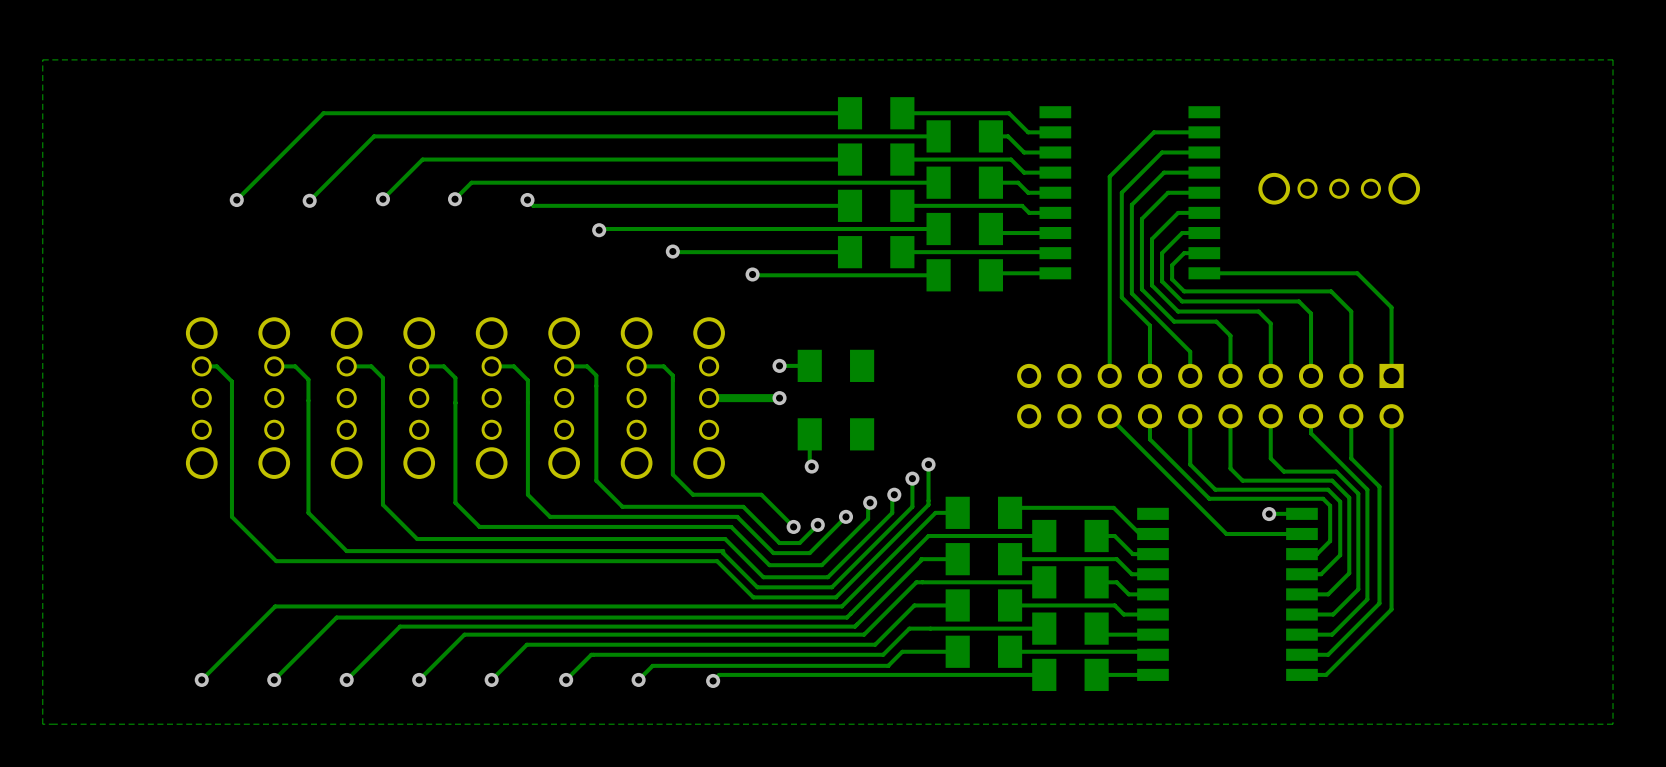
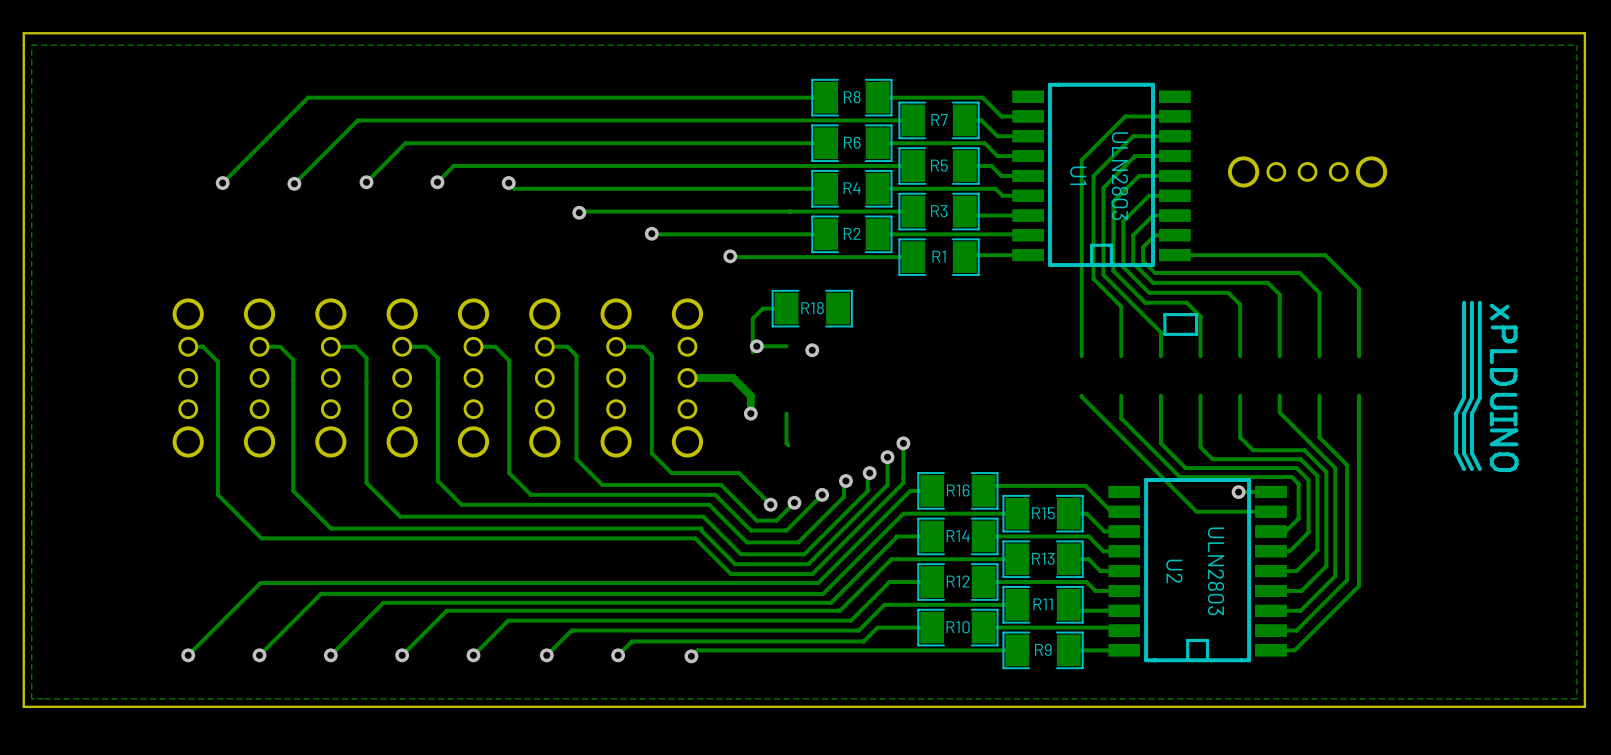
board edge: none -> (1584, 33) (23, 33) (23, 706) (1584, 706) (1584, 33)
part: (876, 113) -> none
R8: none -> (851, 97)
part: (964, 136) -> none
R7: none -> (939, 120)
part: (876, 159) -> none
R6: none -> (851, 143)
part: (964, 182) -> none
R5: none -> (939, 165)
U1: none -> ULN2803 (1101, 174)
part: (876, 205) -> none
R4: none -> (851, 188)
part: (964, 229) -> none
R3: none -> (939, 211)
part: (876, 252) -> none
R2: none -> (851, 234)
part: (964, 275) -> none
R1: none -> (939, 257)
drawing: none -> [1454, 300, 1519, 473]
track: none -> (786, 308) (762, 308) (752, 318) (752, 352)
R18: none -> (812, 308)
line: none -> (1196, 314) (1196, 334) (1164, 334) (1164, 314) (1196, 314)
part: (835, 365) -> none
via: none -> (812, 350)
part: (1210, 396) -> none
track: (779, 398) (755, 398) -> (750, 413) (750, 395) (733, 377)
via: (779, 398) -> none
via: none -> (750, 413)
part: (835, 434) -> none
via: (811, 466) -> none
part: (983, 512) -> none
R16: none -> (957, 490)
part: (1070, 536) -> none
R15: none -> (1043, 513)
part: (983, 559) -> none
R14: none -> (957, 536)
part: (1070, 582) -> none
R13: none -> (1043, 559)
U2: none -> ULN2803 (1197, 570)
part: (983, 605) -> none
R12: none -> (957, 582)
part: (1070, 628) -> none
R11: none -> (1043, 604)
part: (983, 651) -> none
R10: none -> (957, 627)
part: (1070, 674) -> none
R9: none -> (1043, 650)

